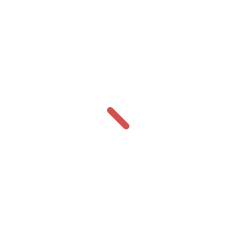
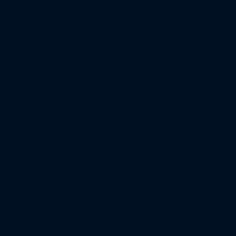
top track: (110, 110) (126, 126) -> none

